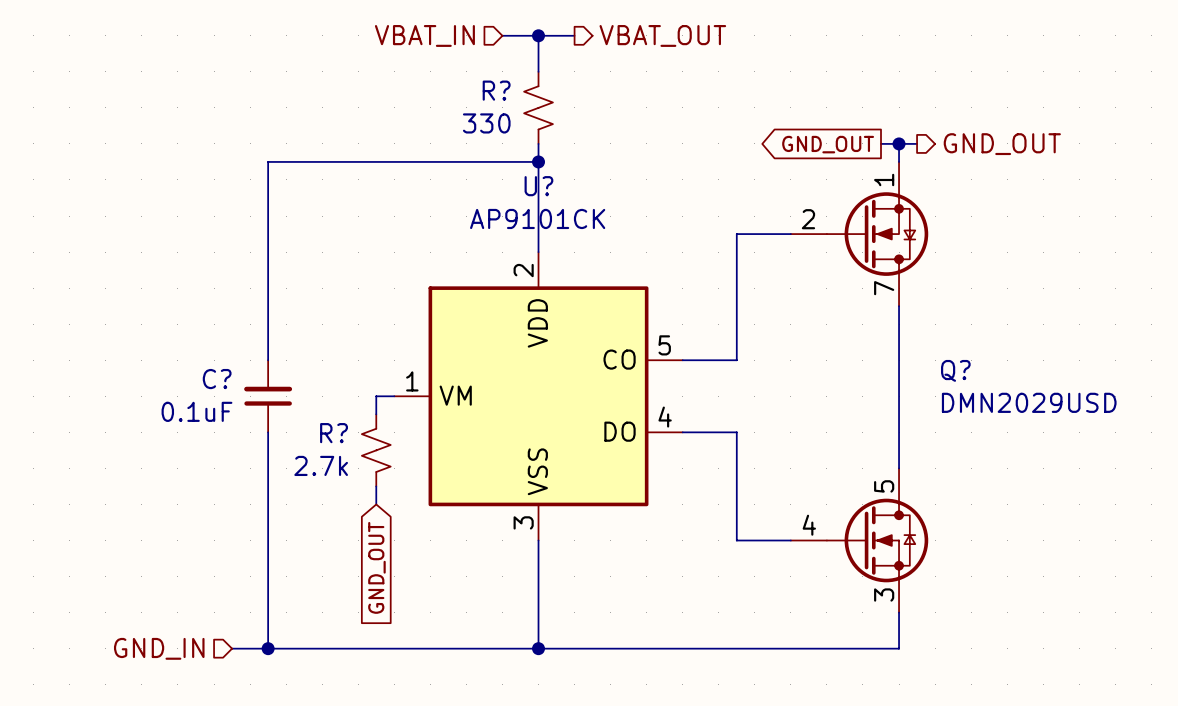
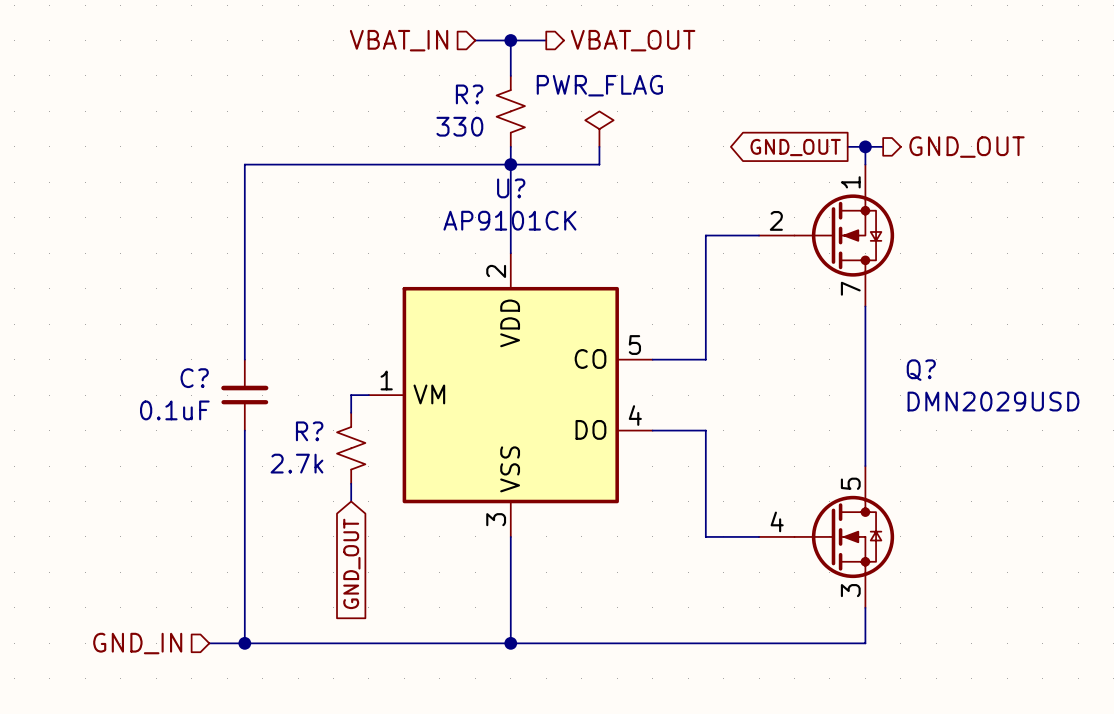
power symbol: none -> PWR_FLAG (599, 129)
wire: none -> (599, 146) (599, 164) (510, 164)

